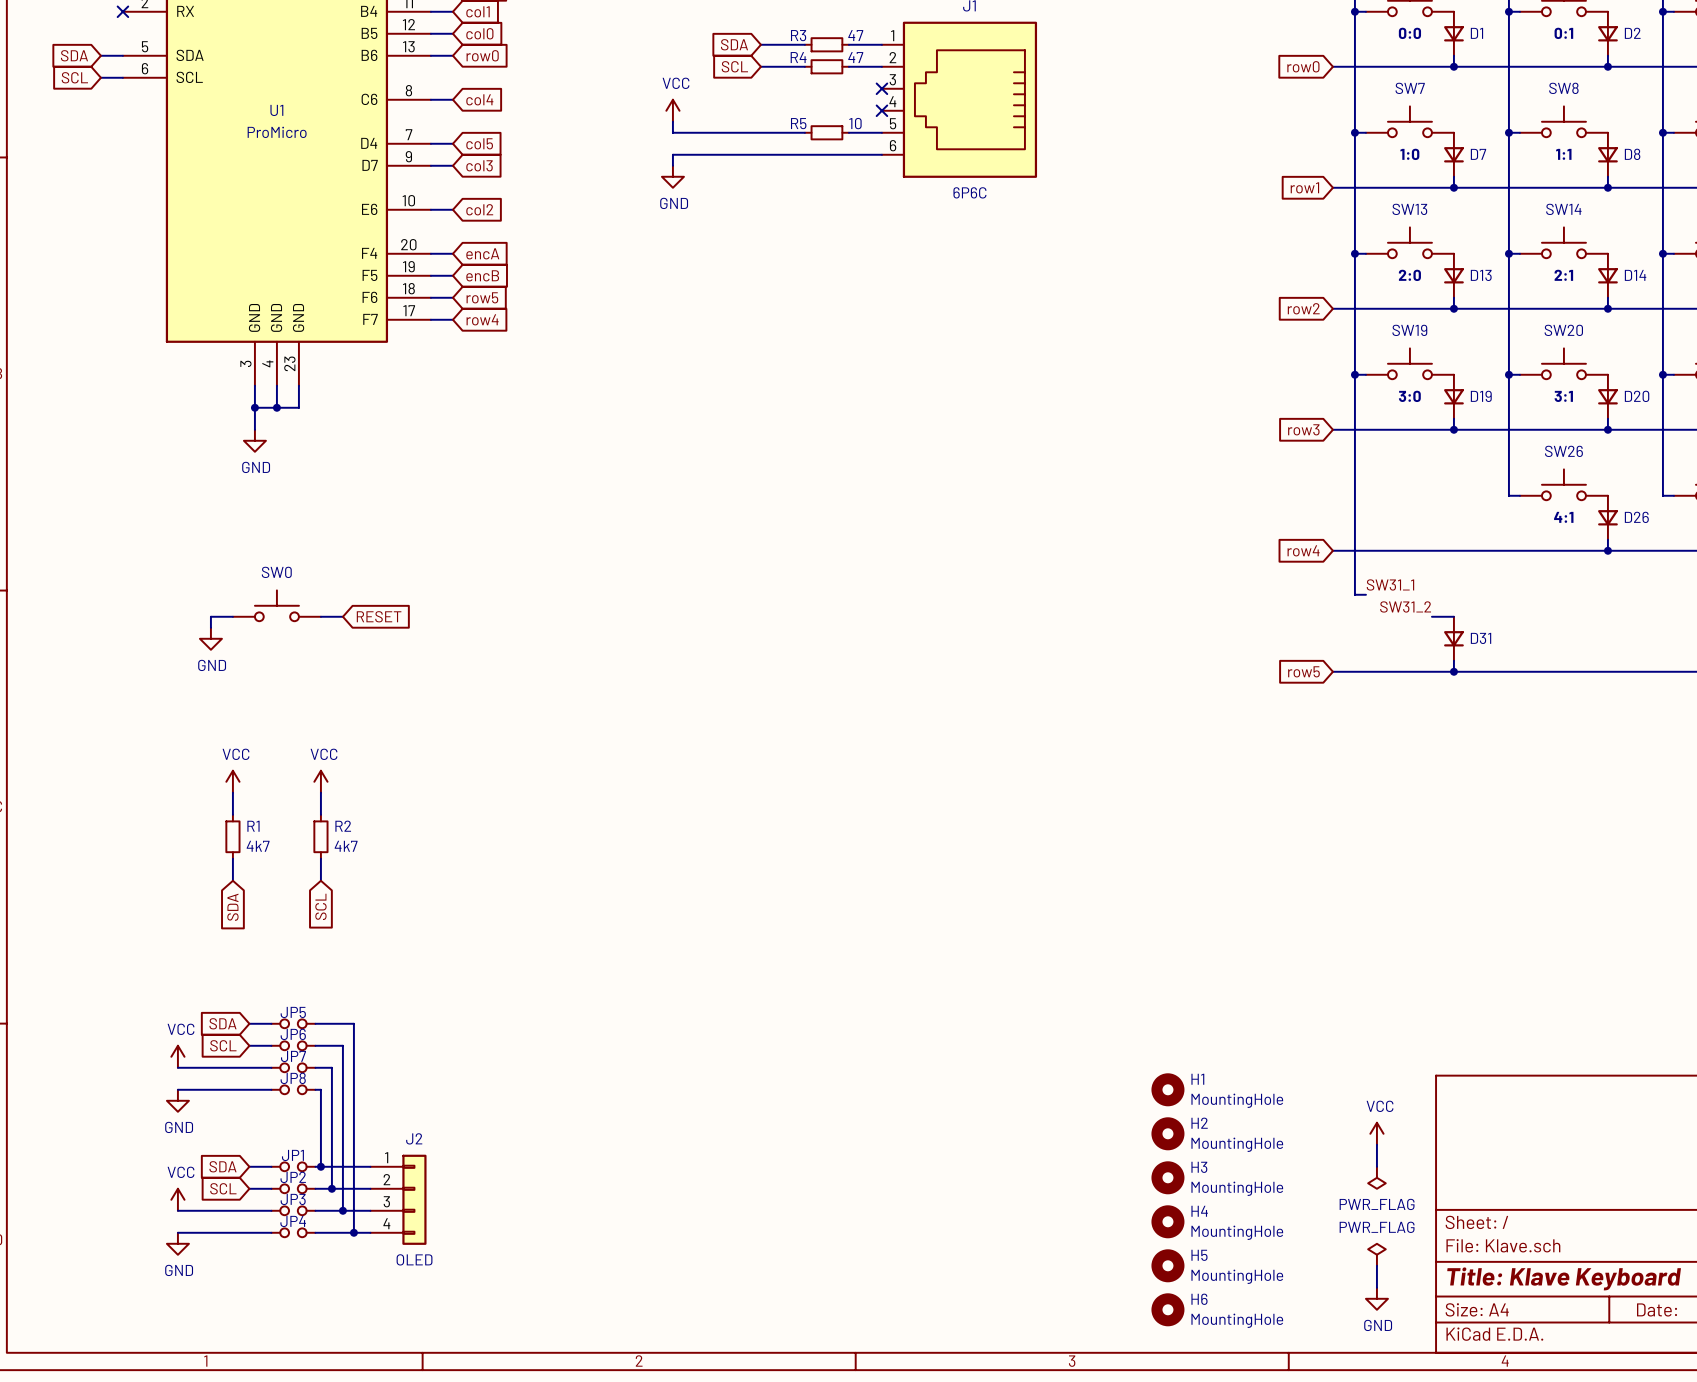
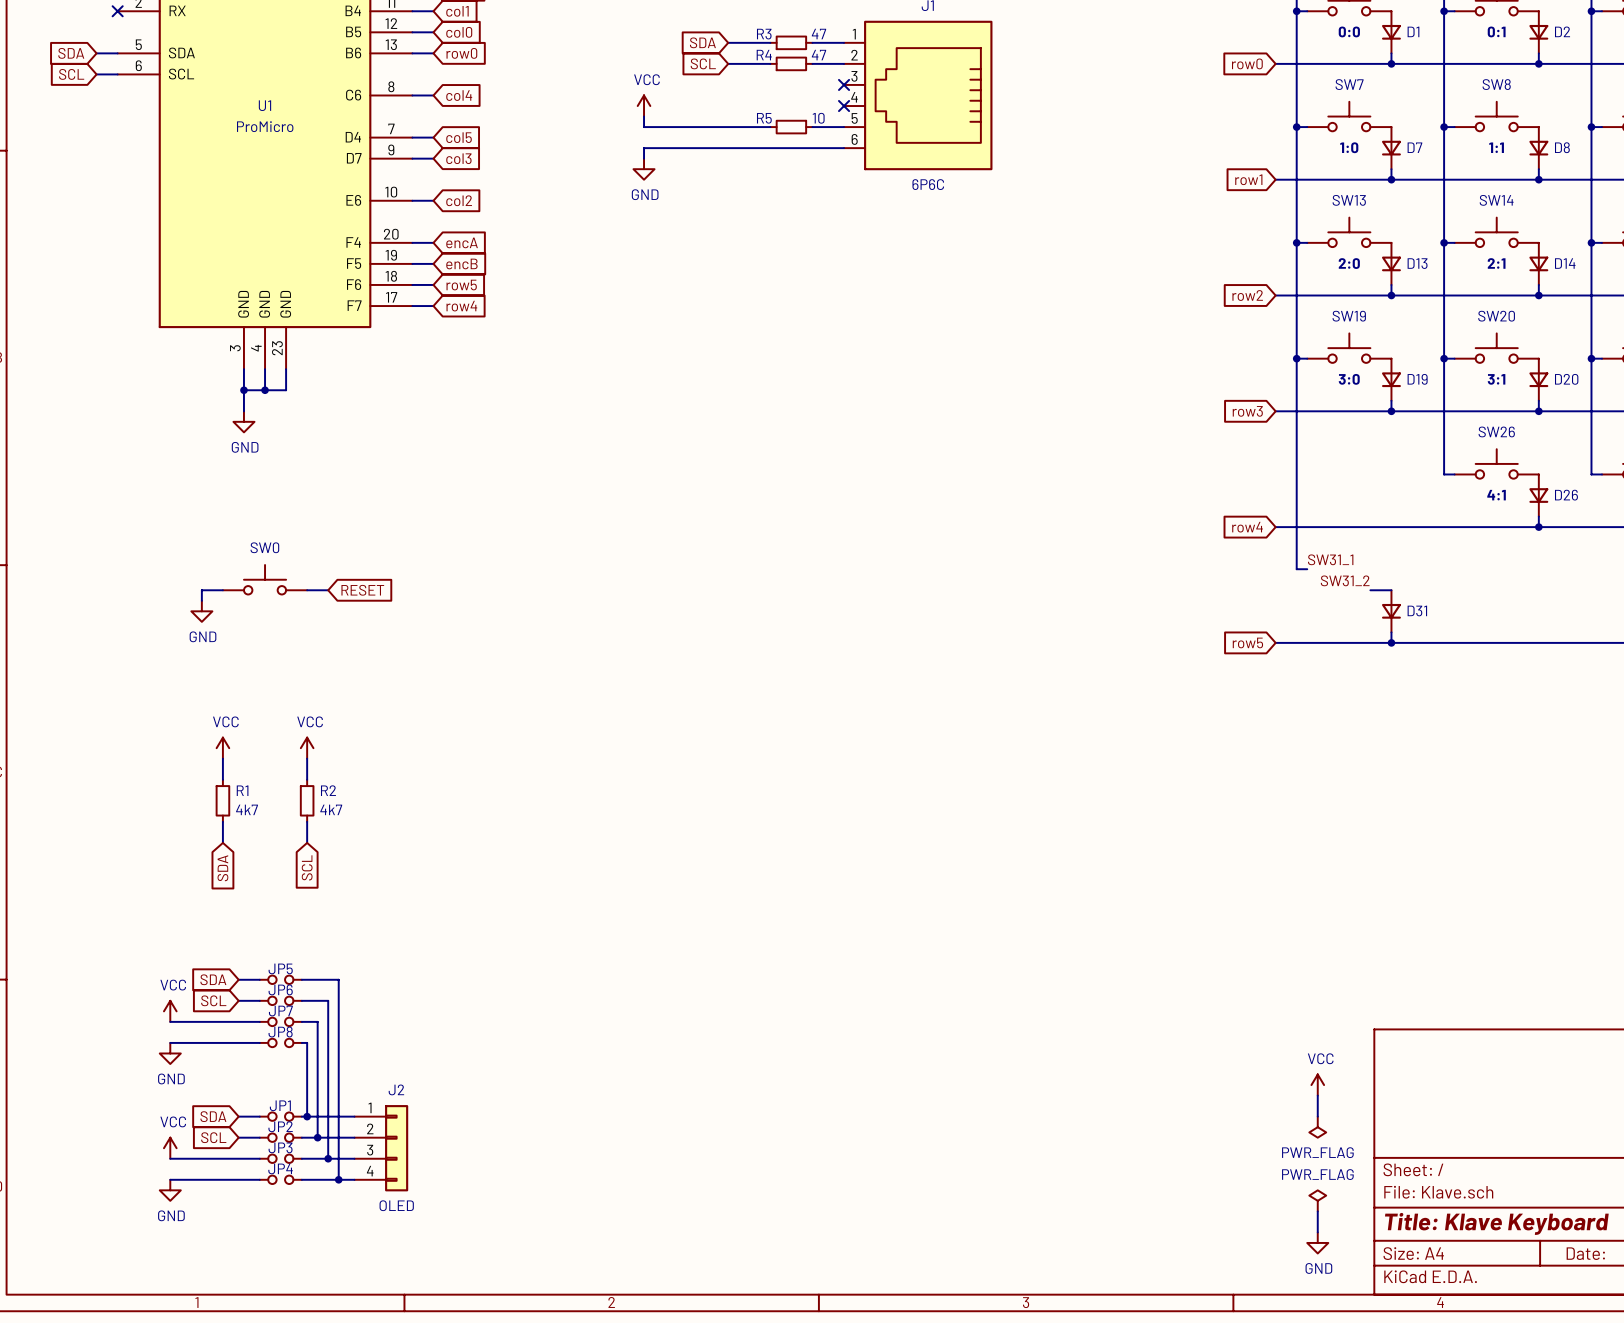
H1: MountingHole (1167, 1089) -> none
H2: MountingHole (1167, 1133) -> none
H3: MountingHole (1167, 1177) -> none
H4: MountingHole (1167, 1221) -> none
H5: MountingHole (1167, 1265) -> none
H6: MountingHole (1167, 1309) -> none

